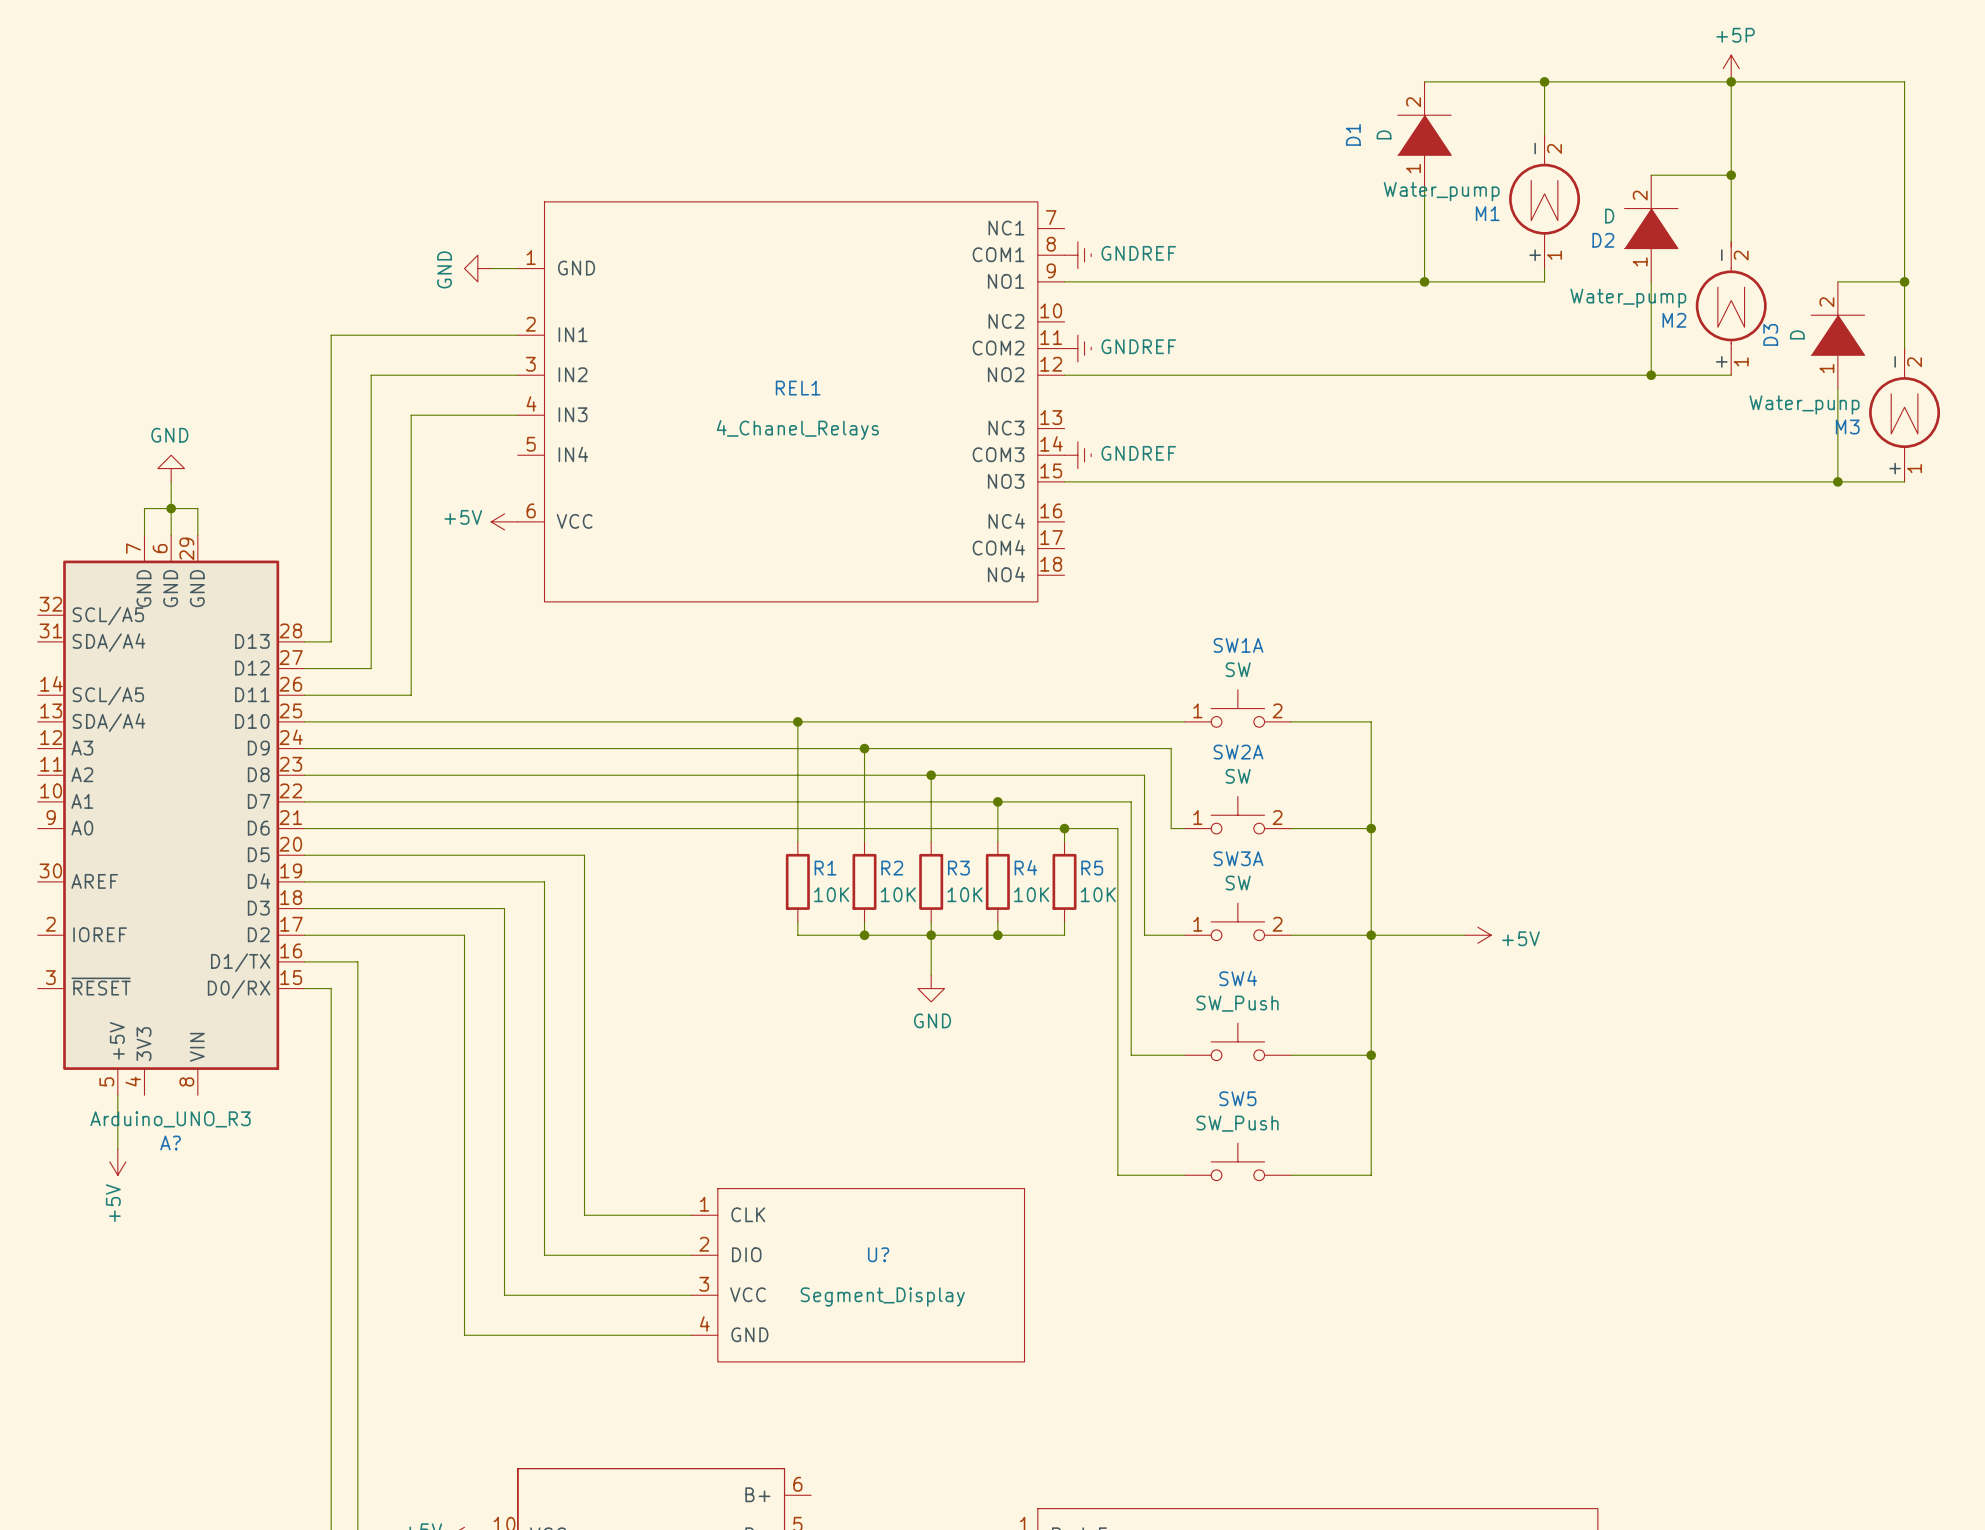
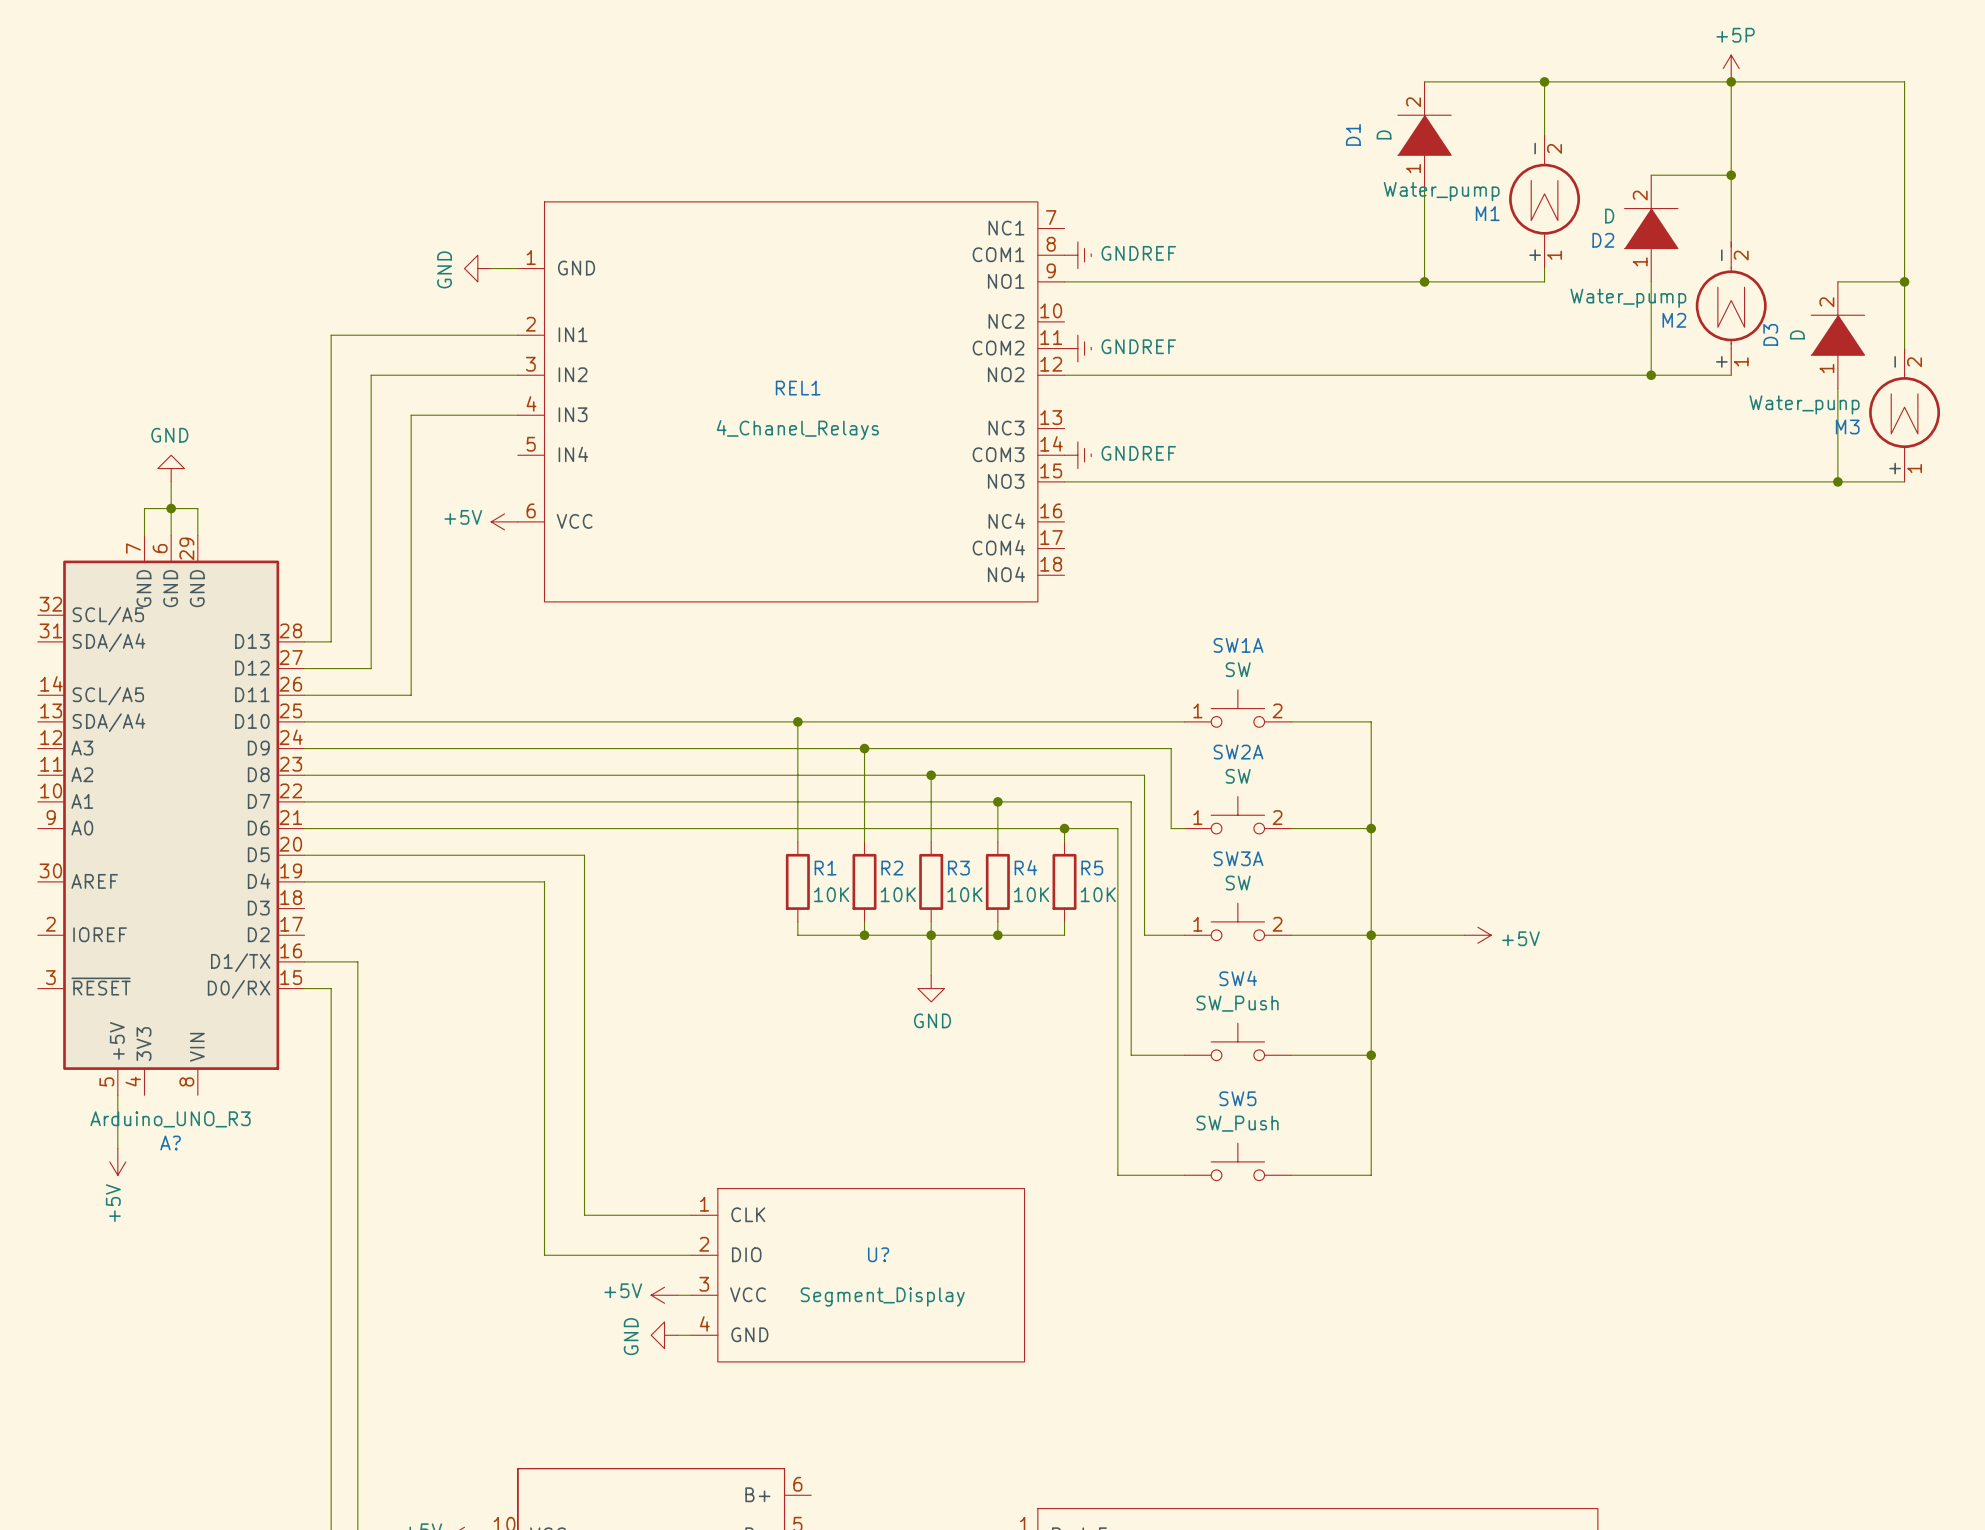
wire: (304, 908) (504, 908) (504, 1295) (677, 1295) -> none
wire: (304, 935) (464, 935) (464, 1335) (677, 1335) -> none
power symbol: none -> +5V (664, 1295)
power symbol: none -> GND (664, 1335)

